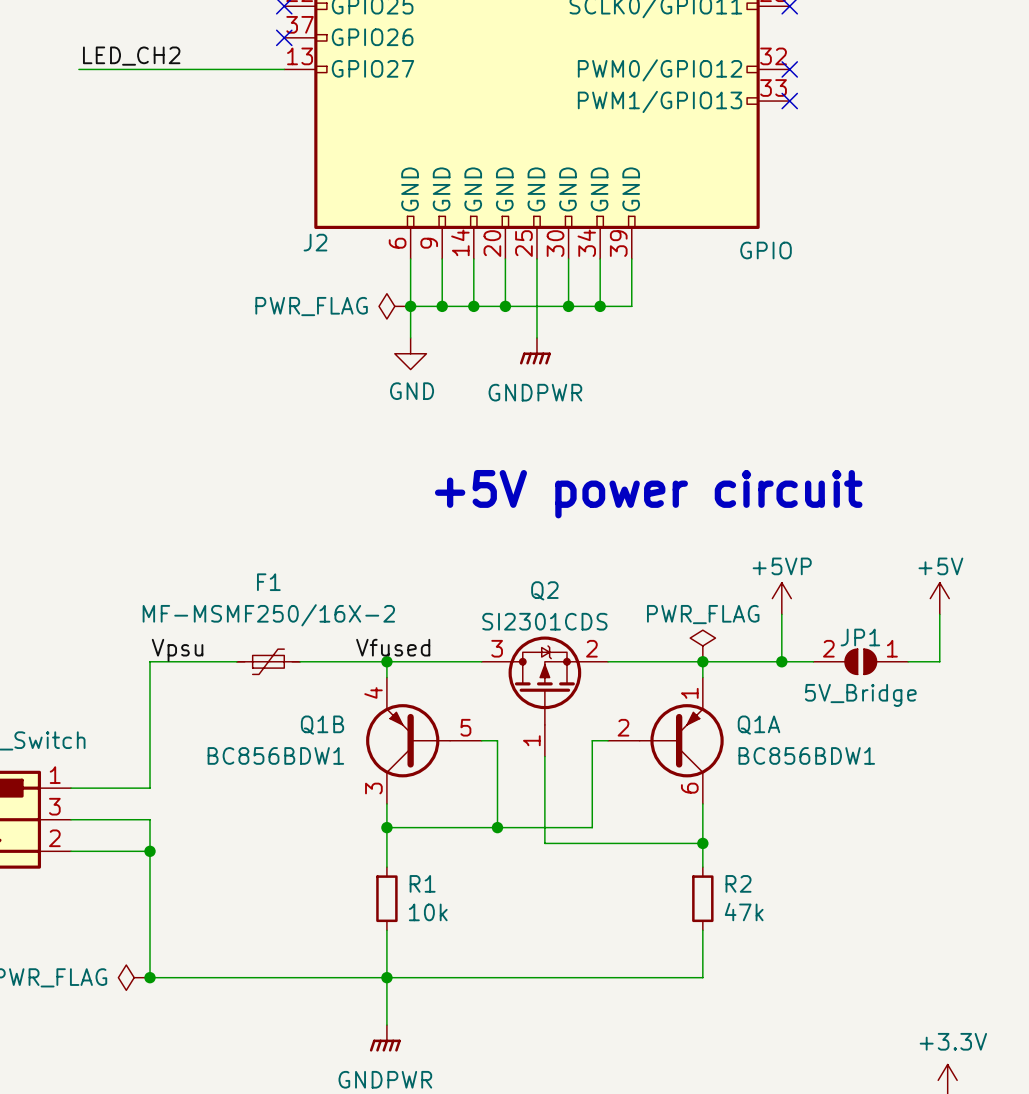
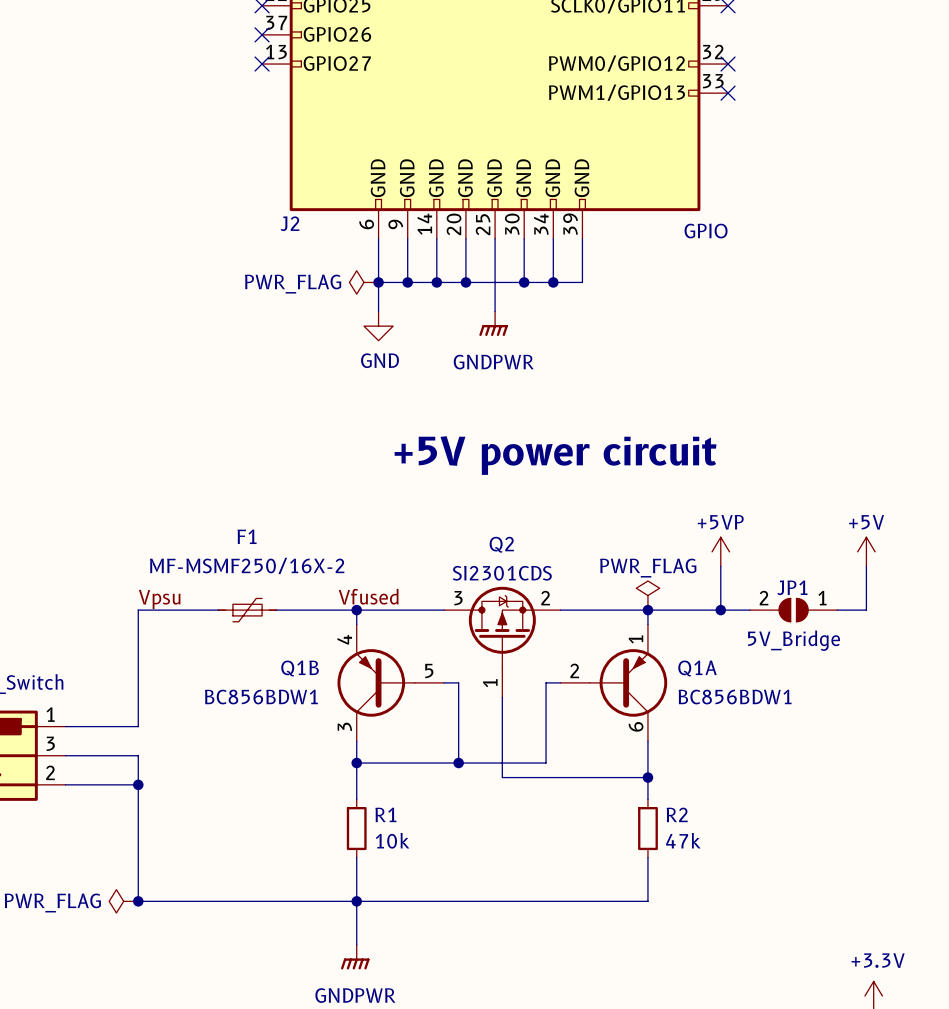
label: LED_CH2 (131, 56) -> none
wire: (78, 69) (284, 69) -> none
no-connect mark: none -> (262, 64)

